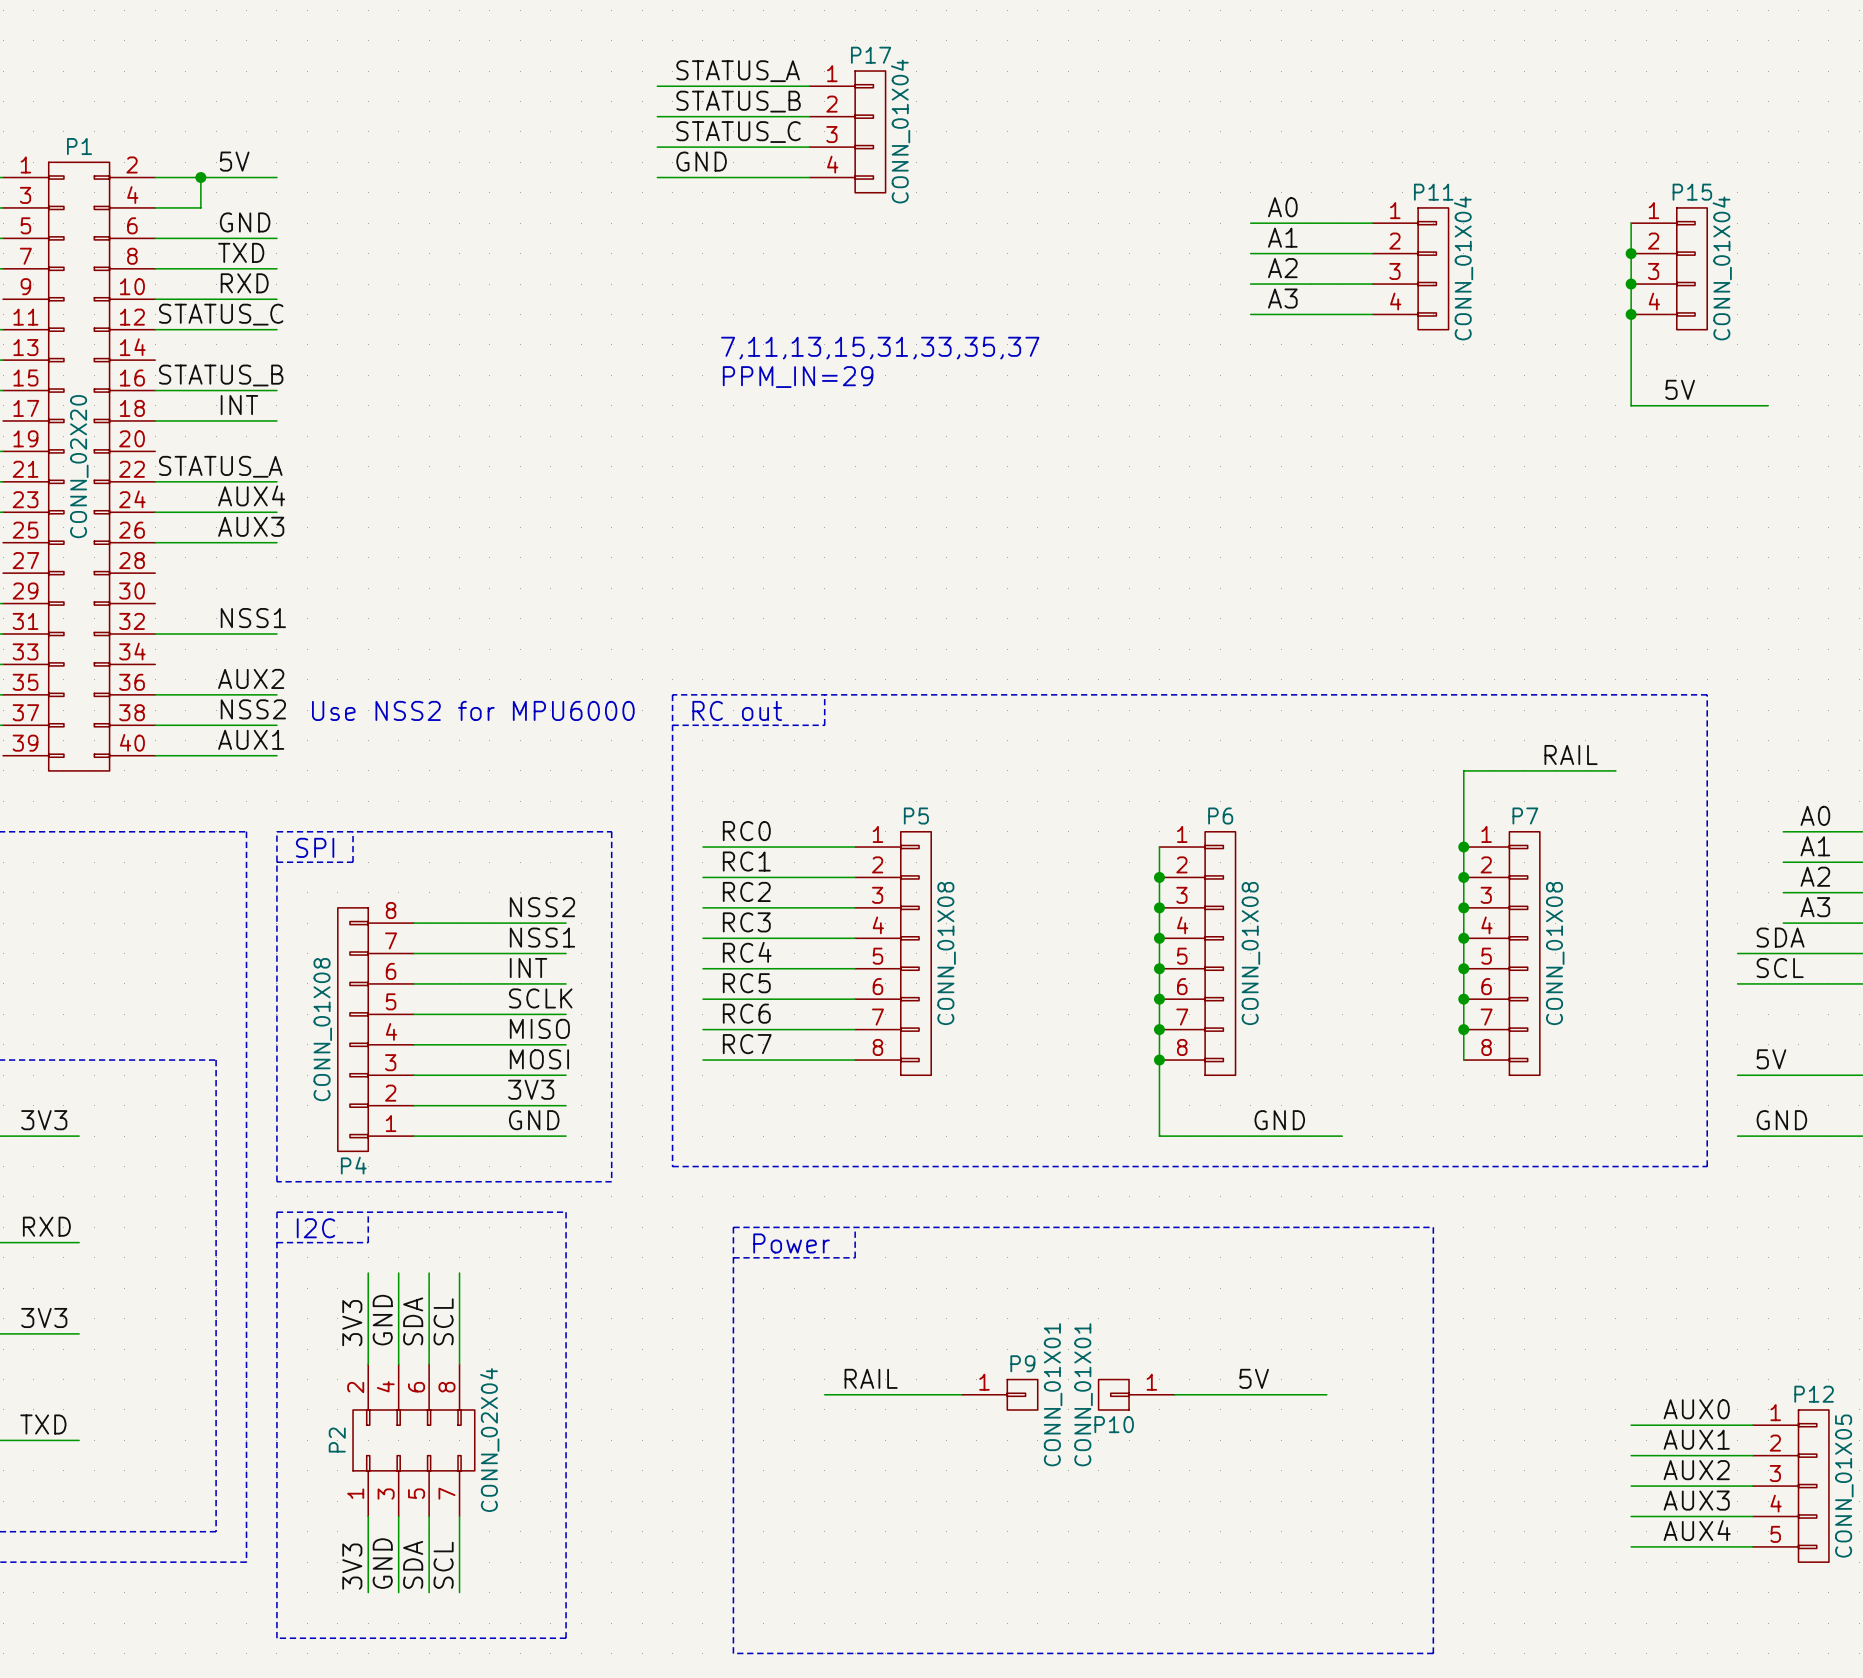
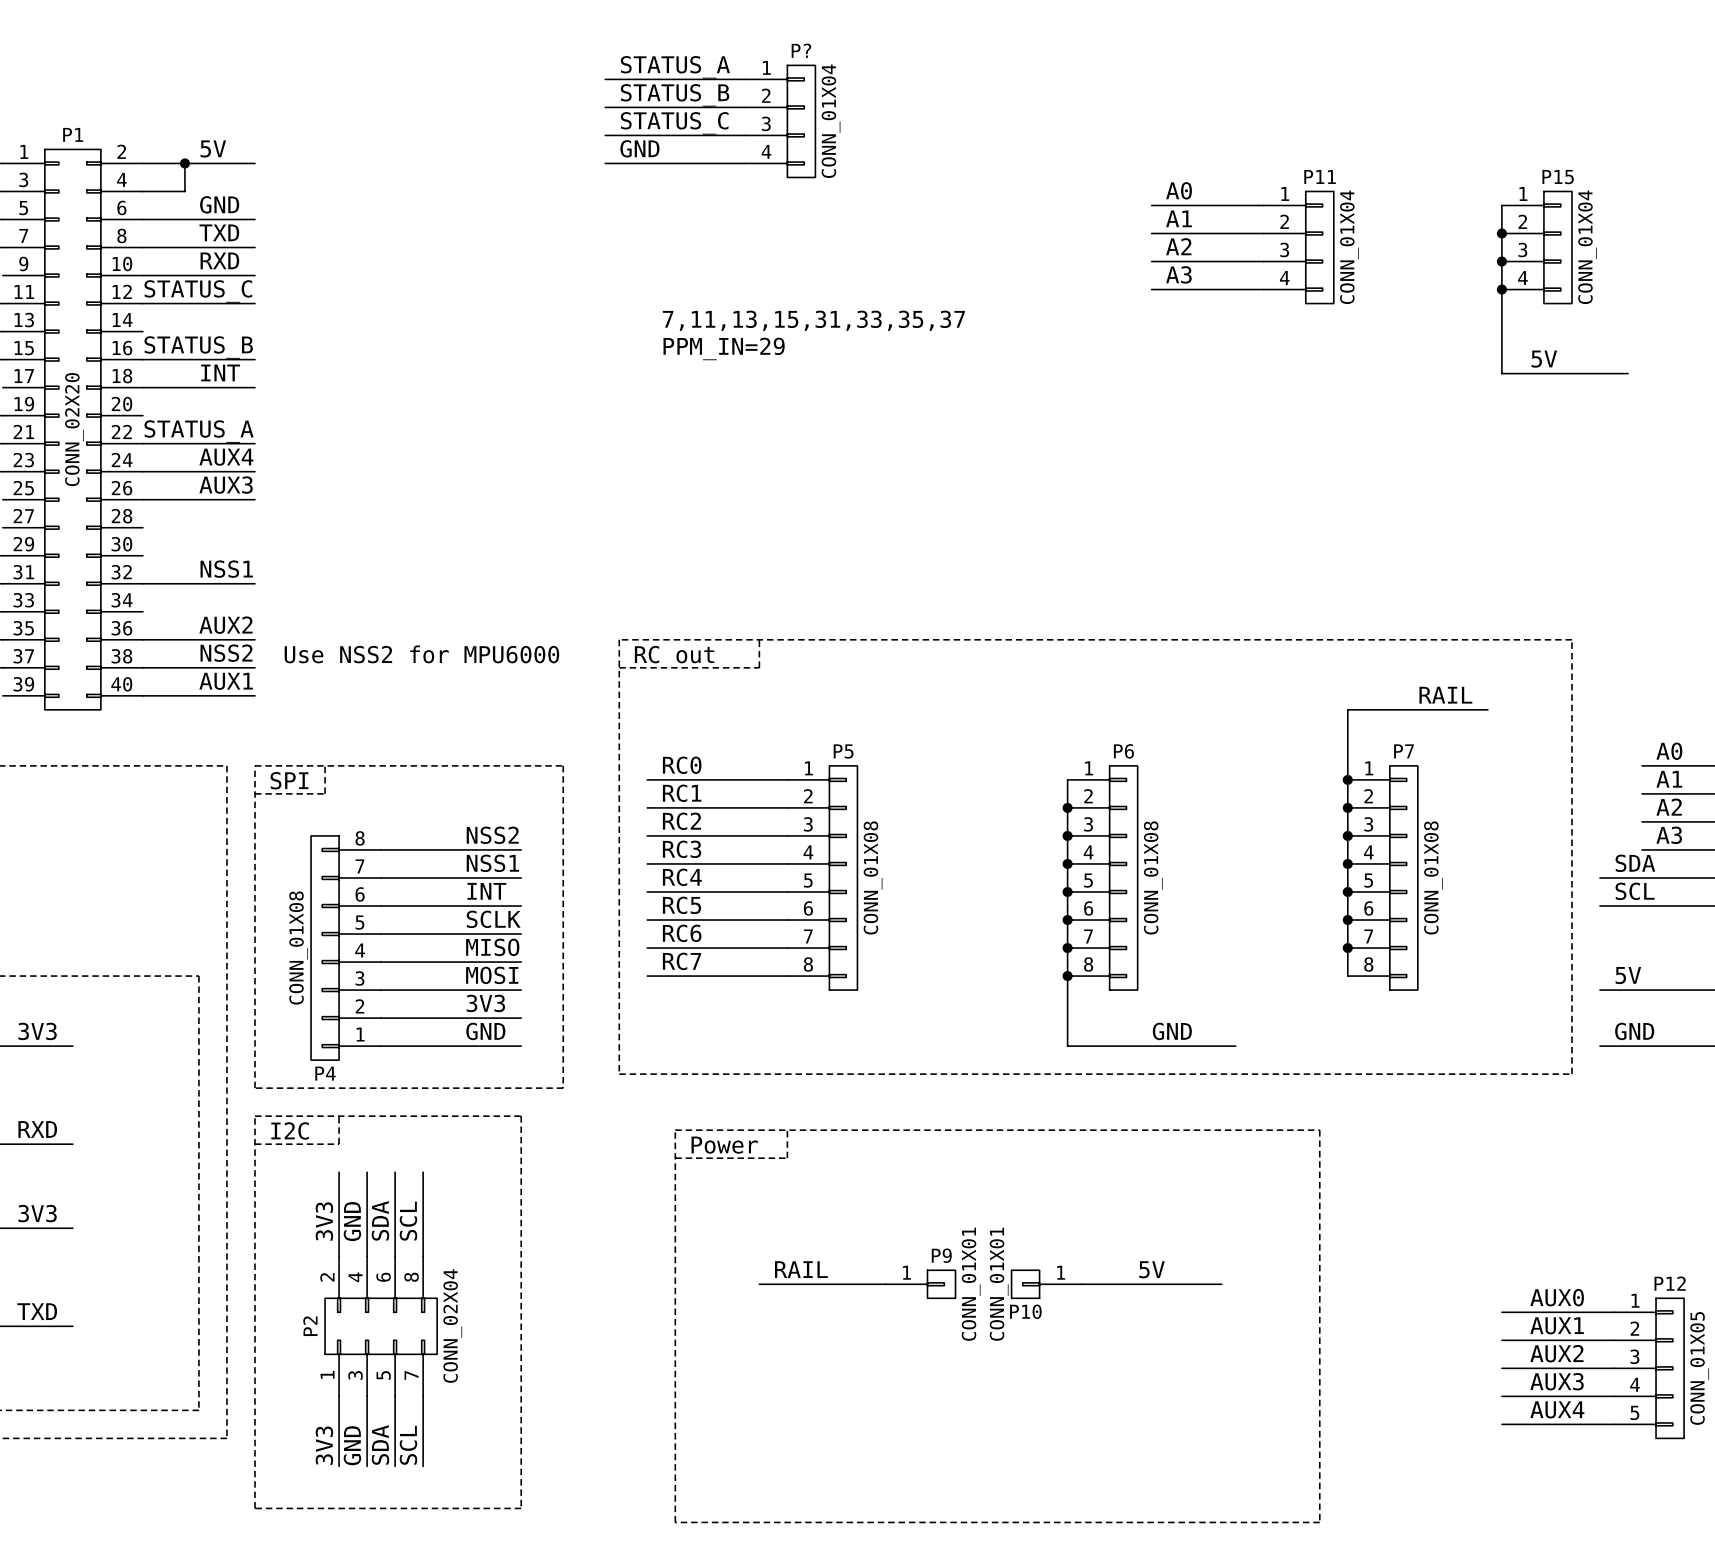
P17 name: P17 (871, 55) -> P? (801, 50)

